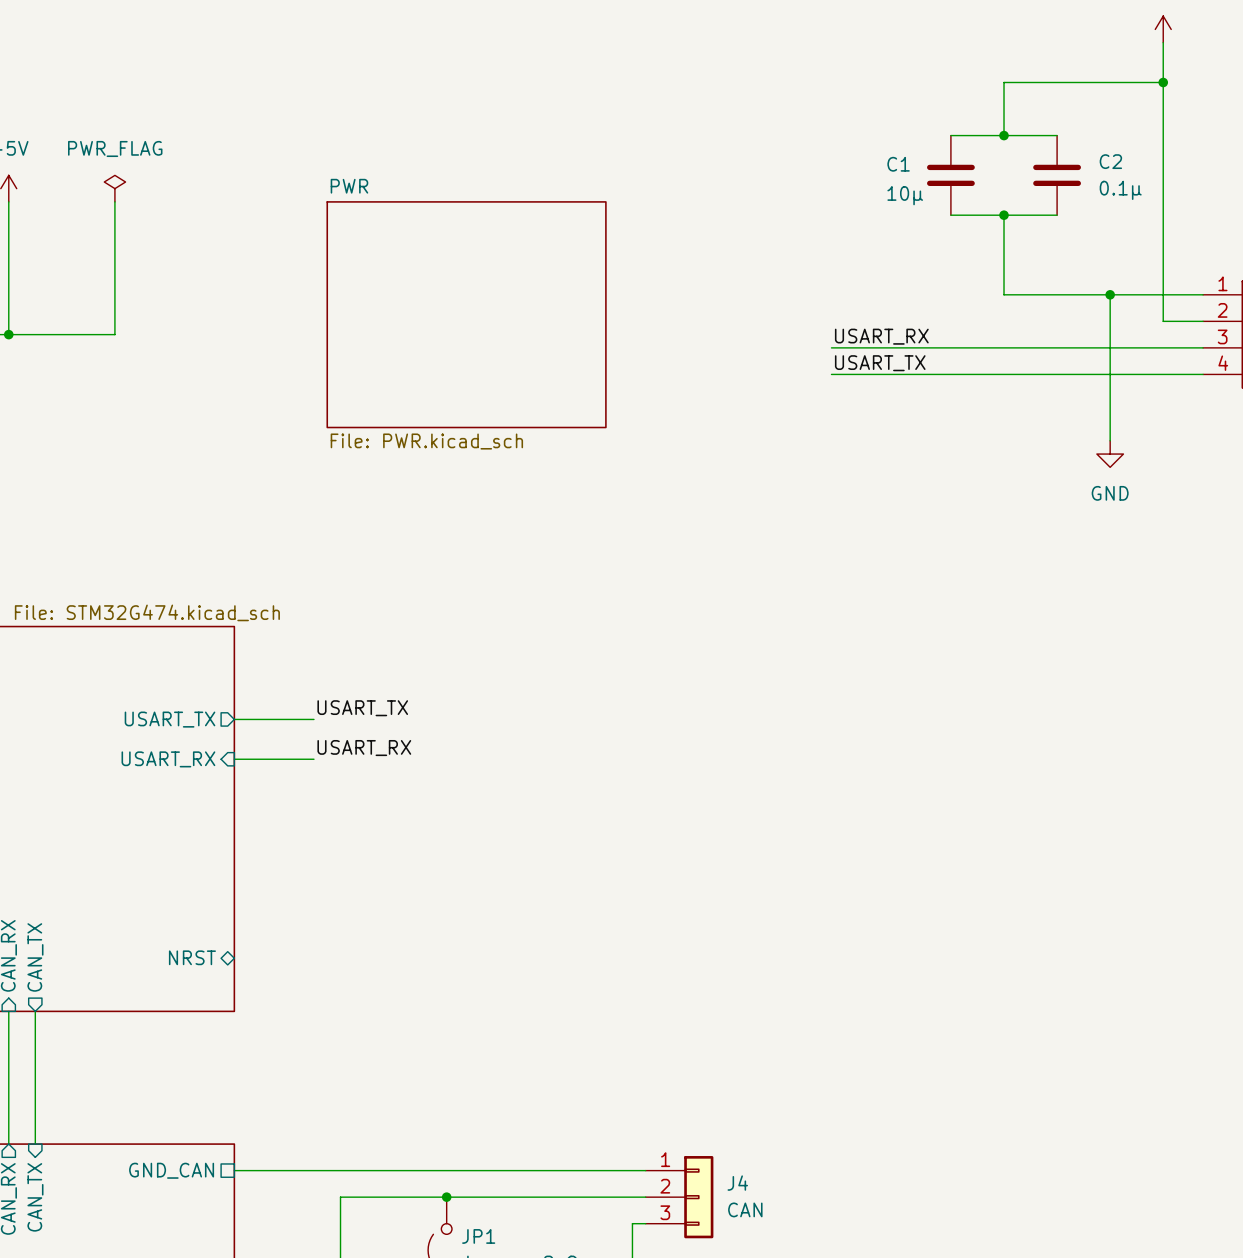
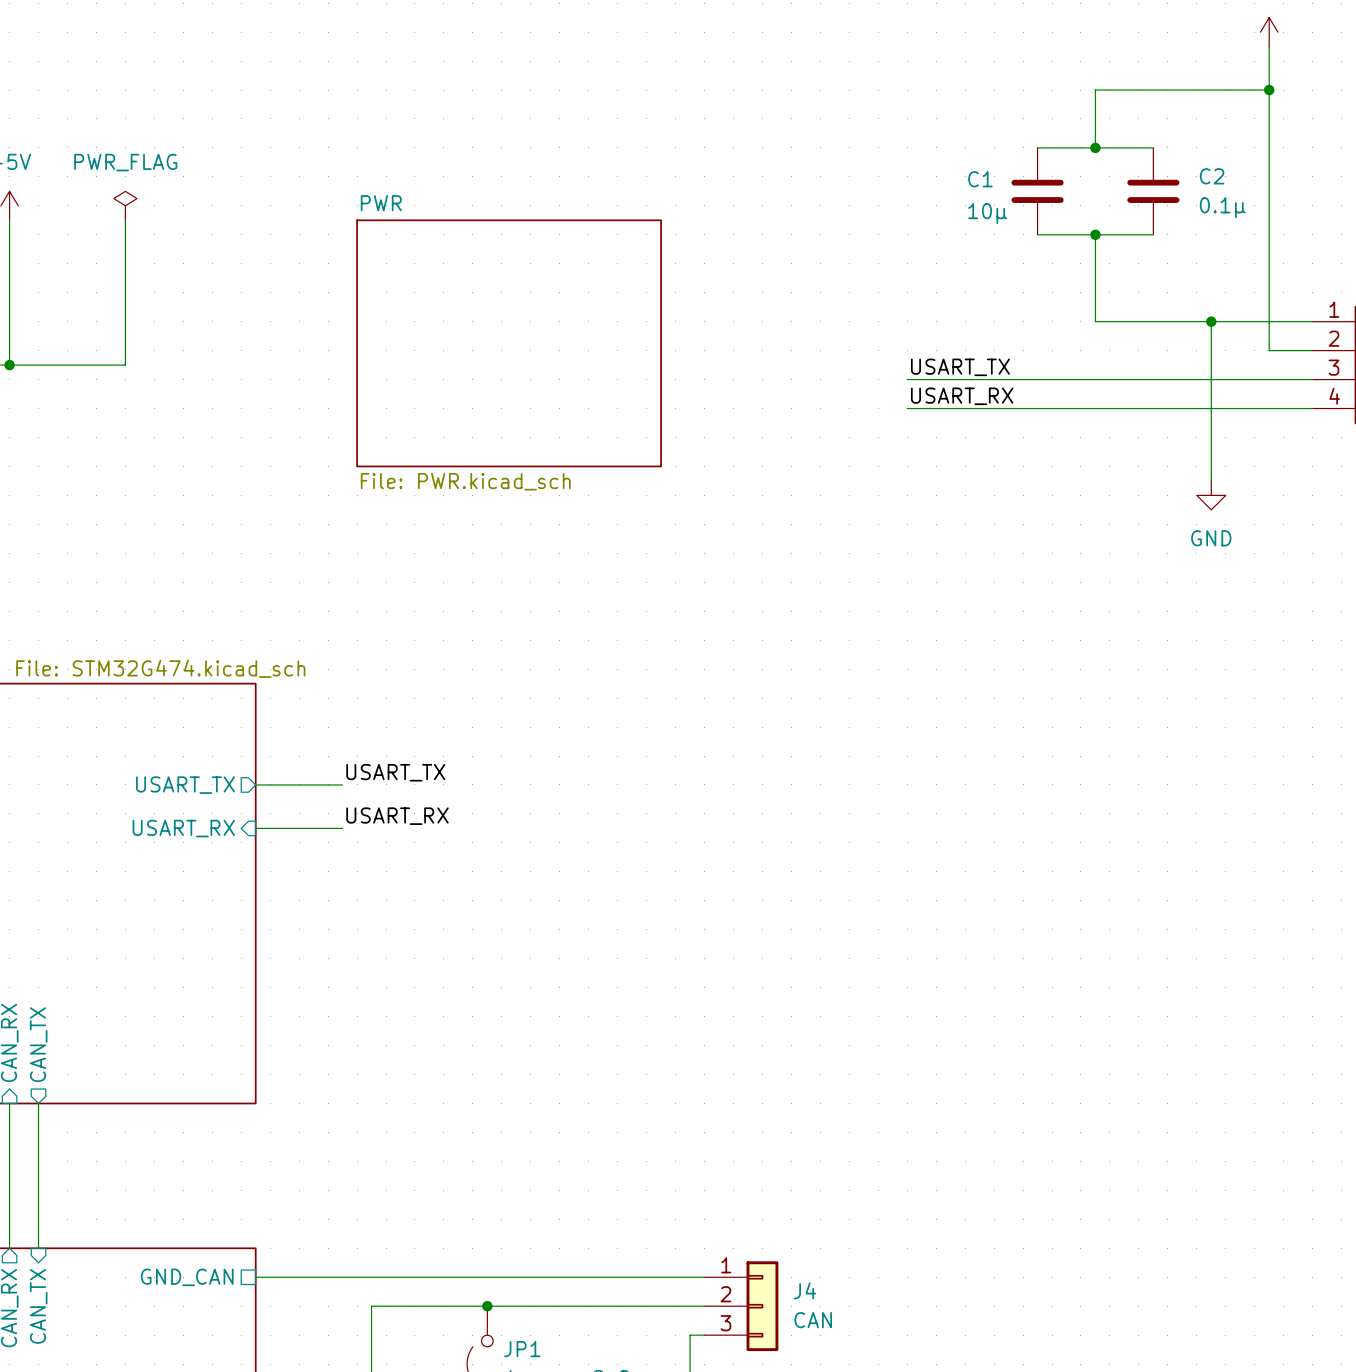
label: USART_RX (881, 336) -> USART_TX (960, 367)
label: USART_TX (880, 363) -> USART_RX (962, 396)
sheet pin: NRST (192, 957) -> none

